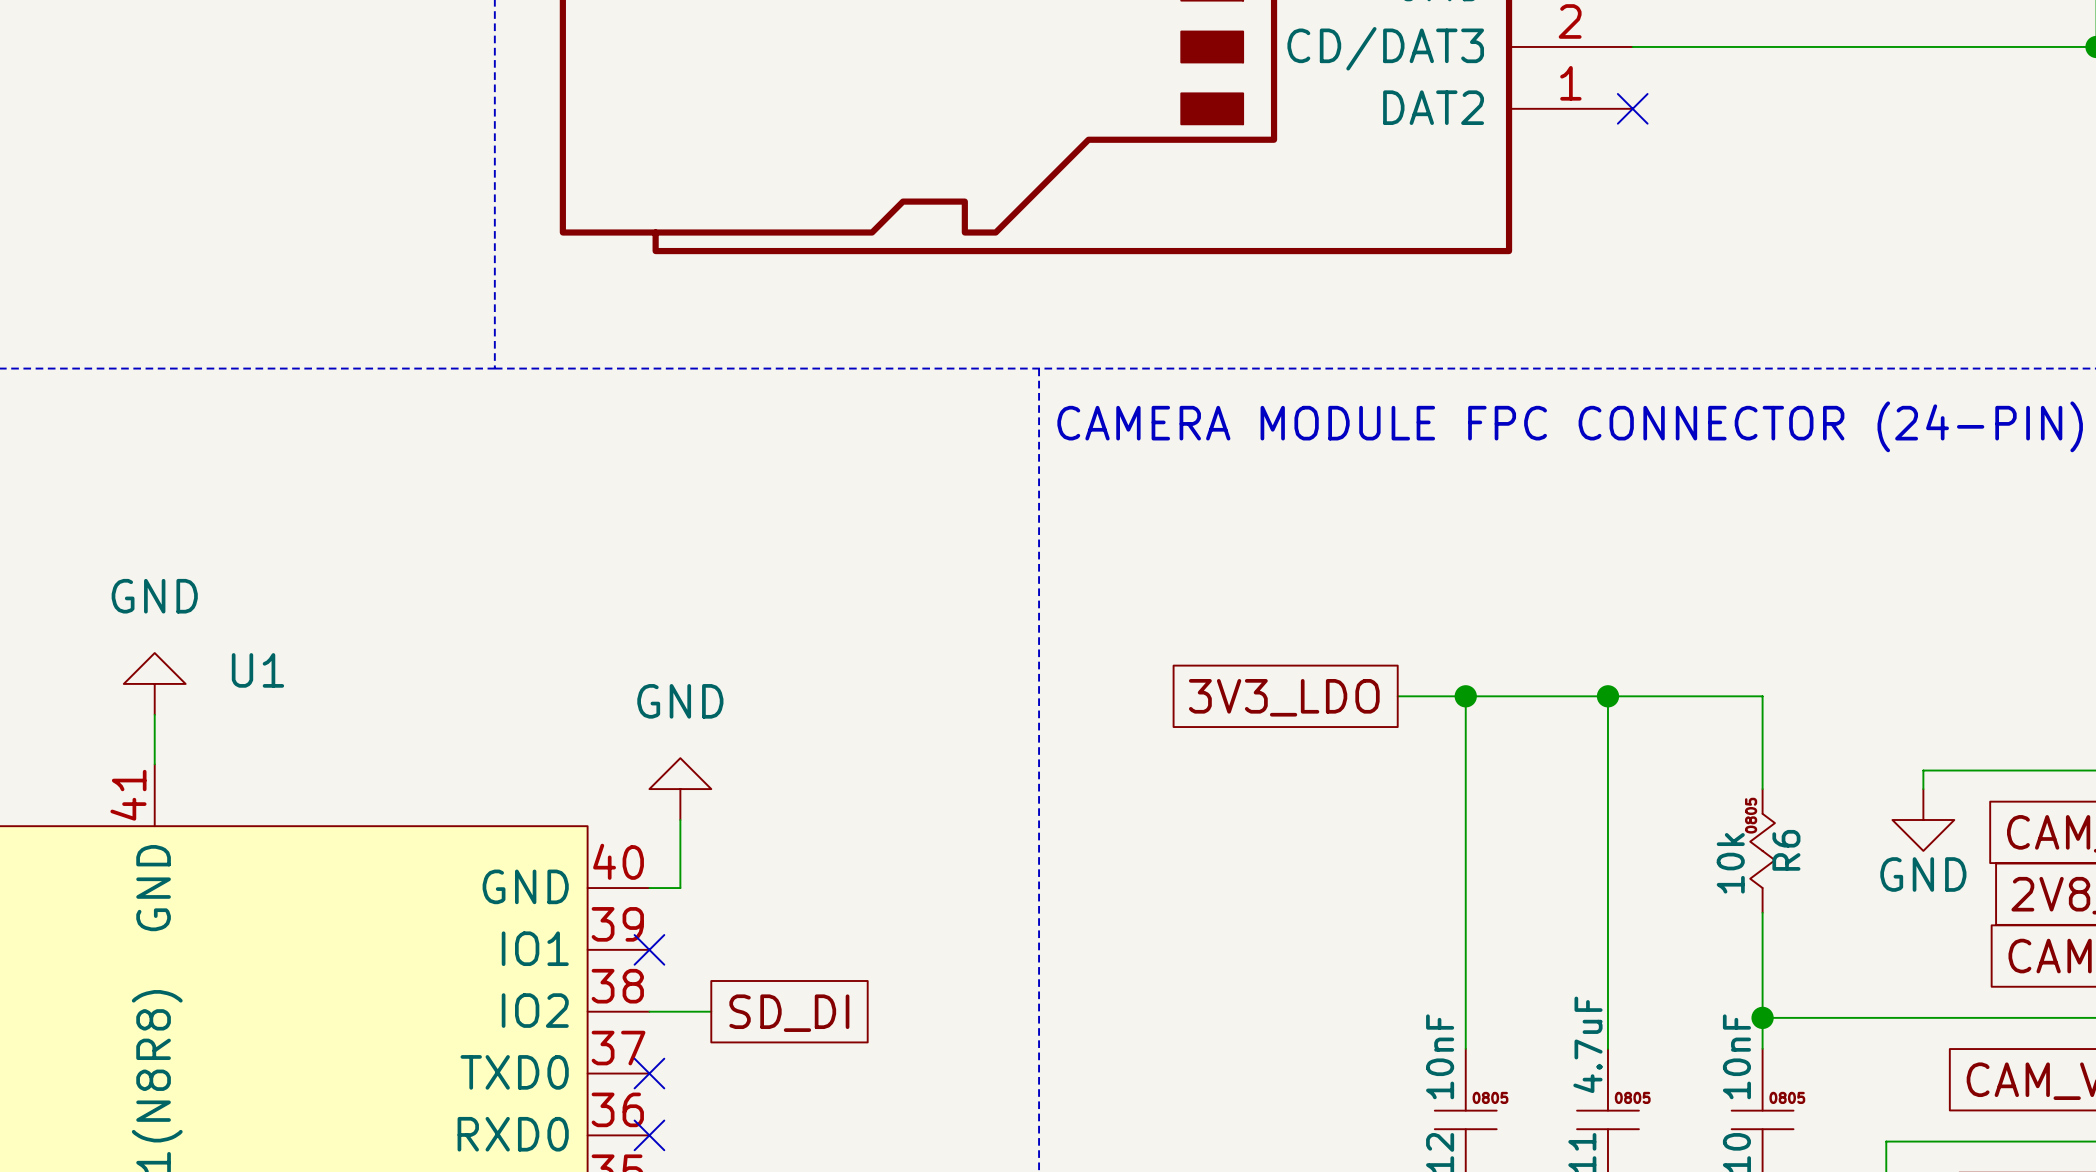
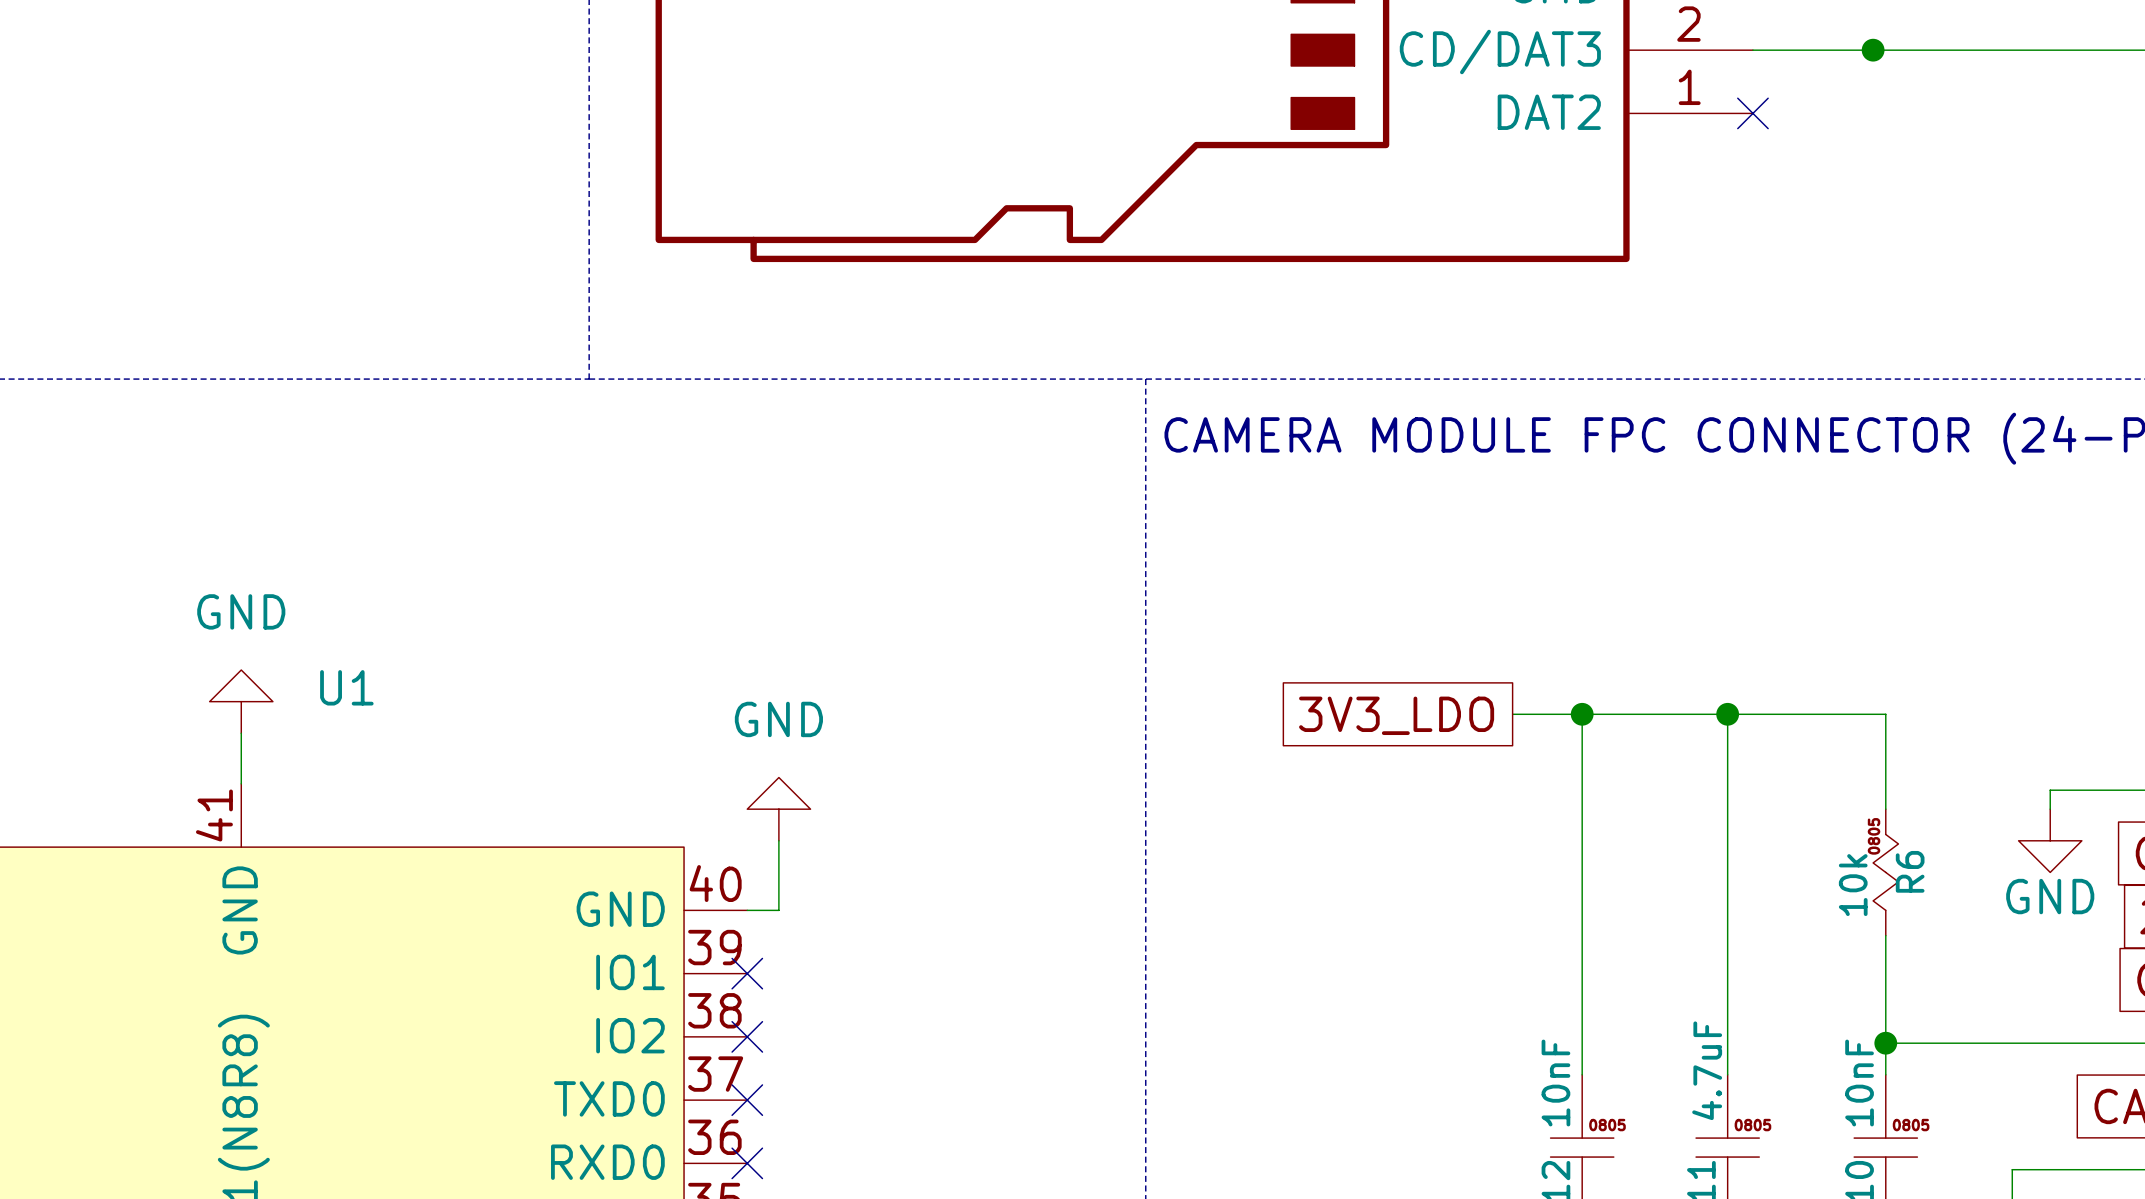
junction: none -> (1873, 50)
wire: (649, 1011) (711, 1011) -> none
no-connect mark: none -> (747, 1036)
global label: SD_DI (789, 1013) -> none

